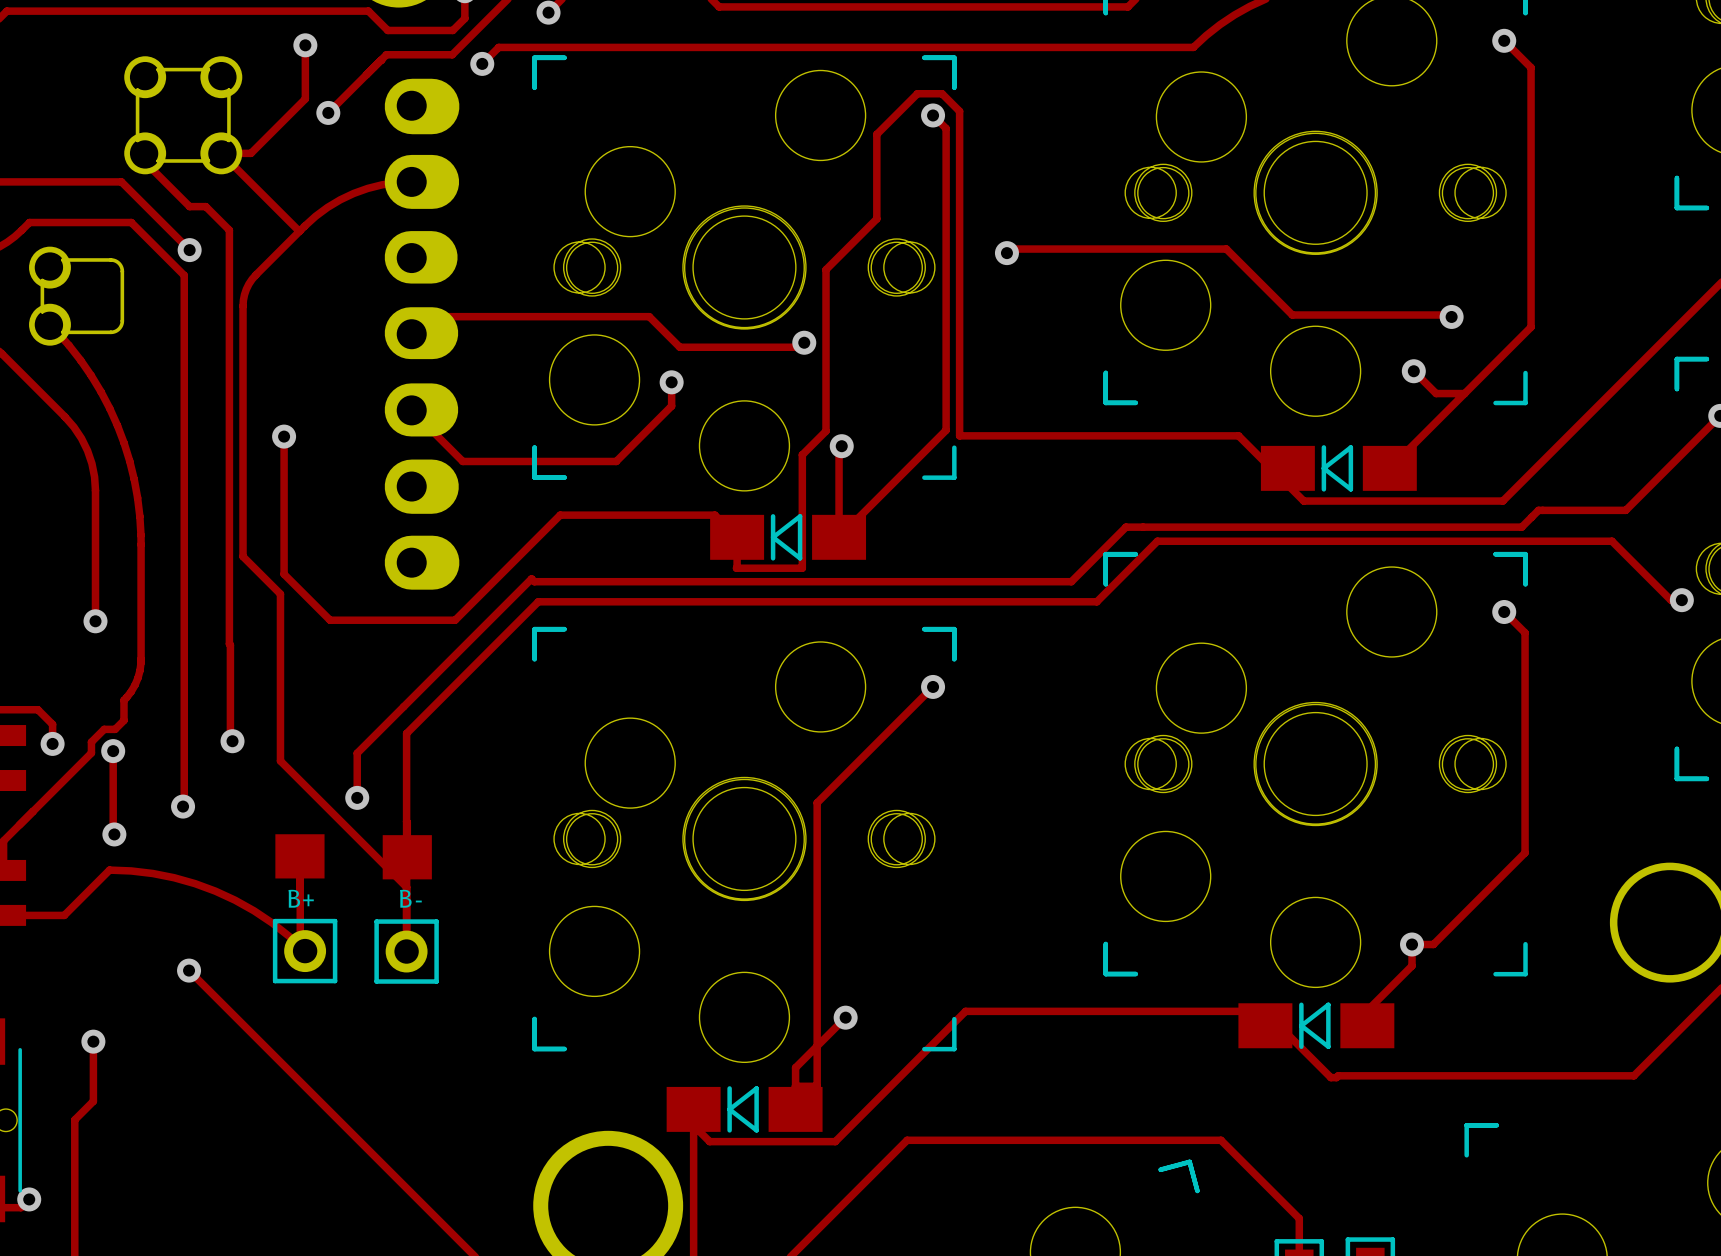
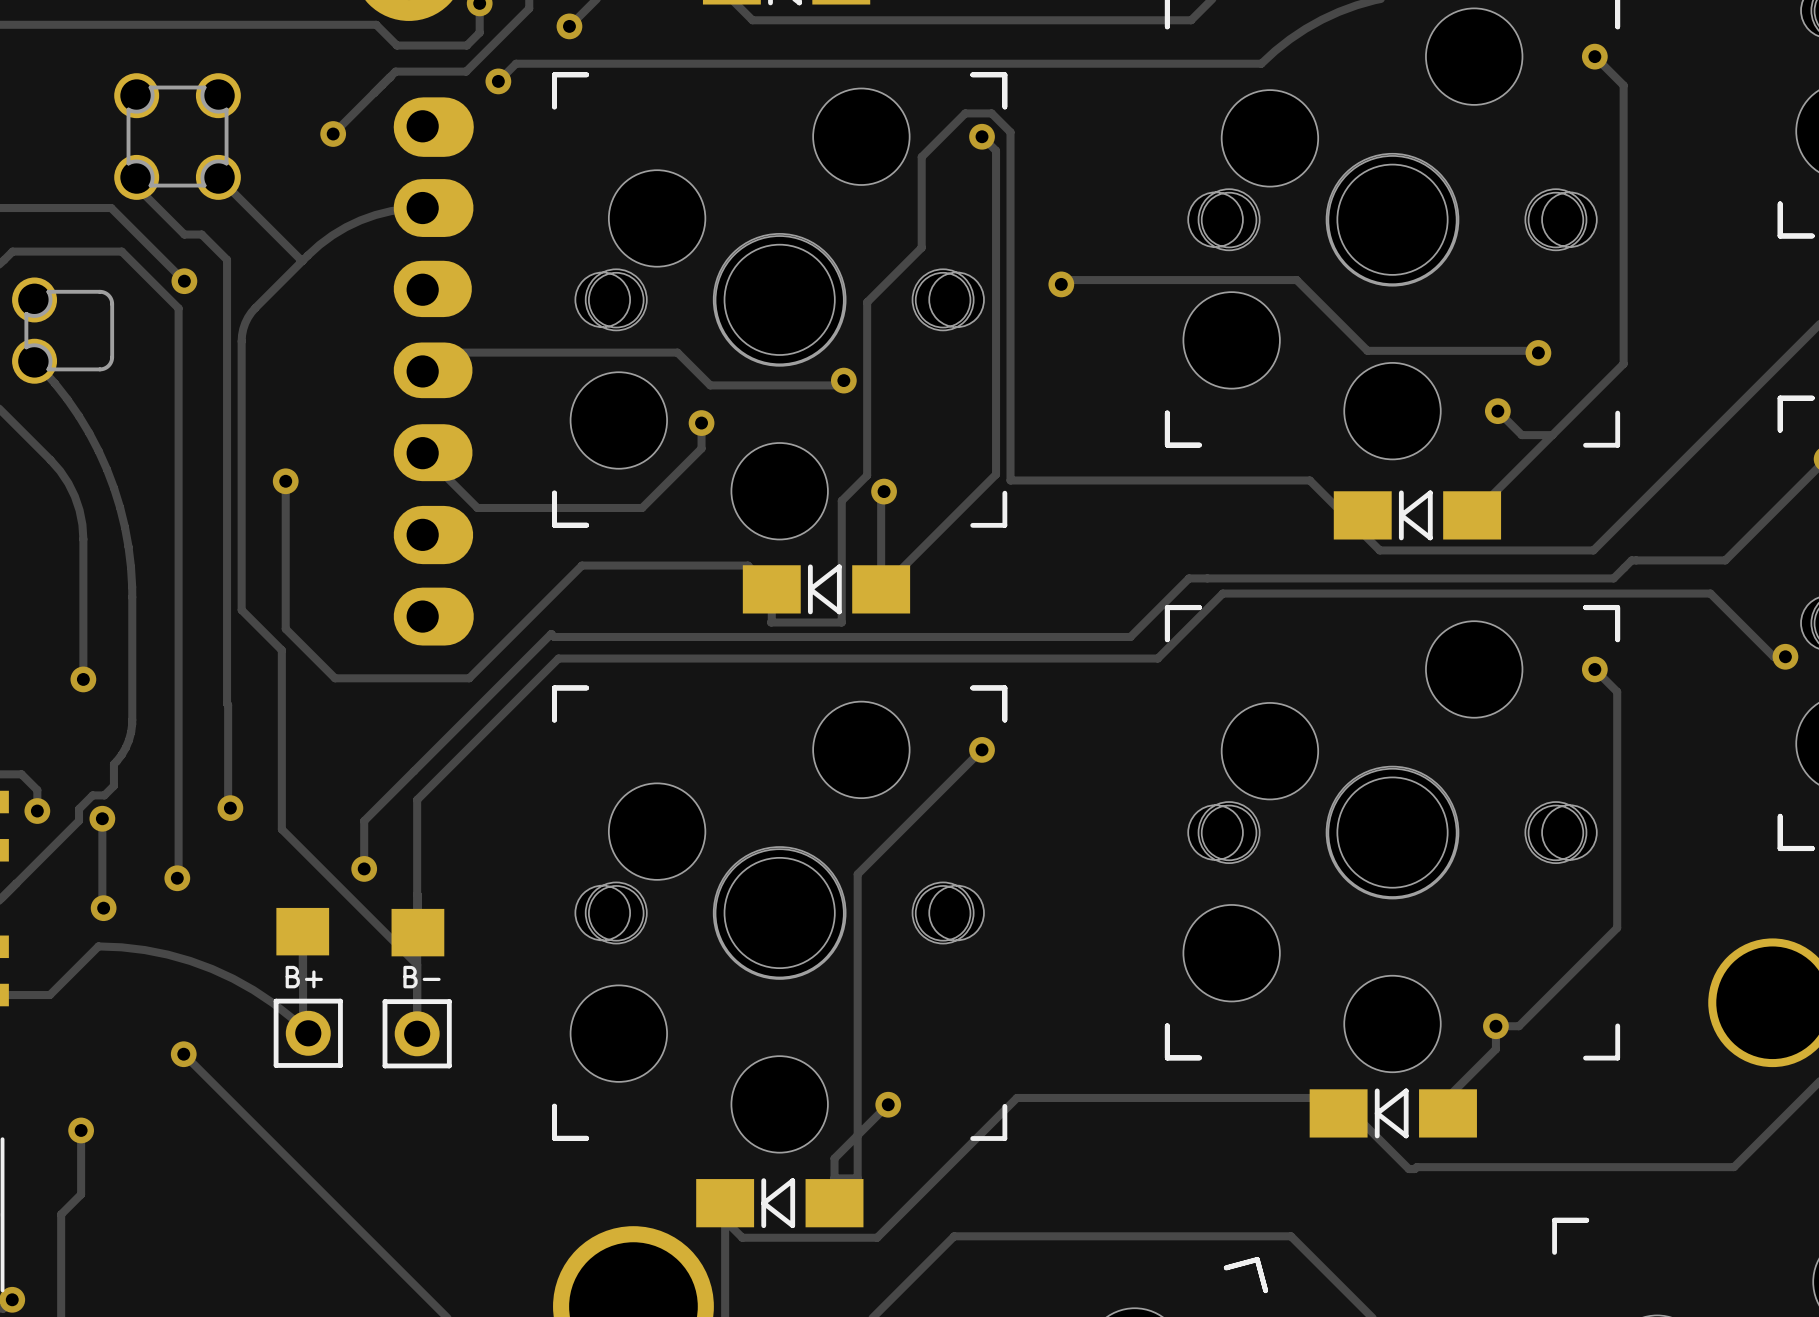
track: (305, 45) (305, 98) (250, 153) (221, 153) -> none
via: (305, 45) -> none

